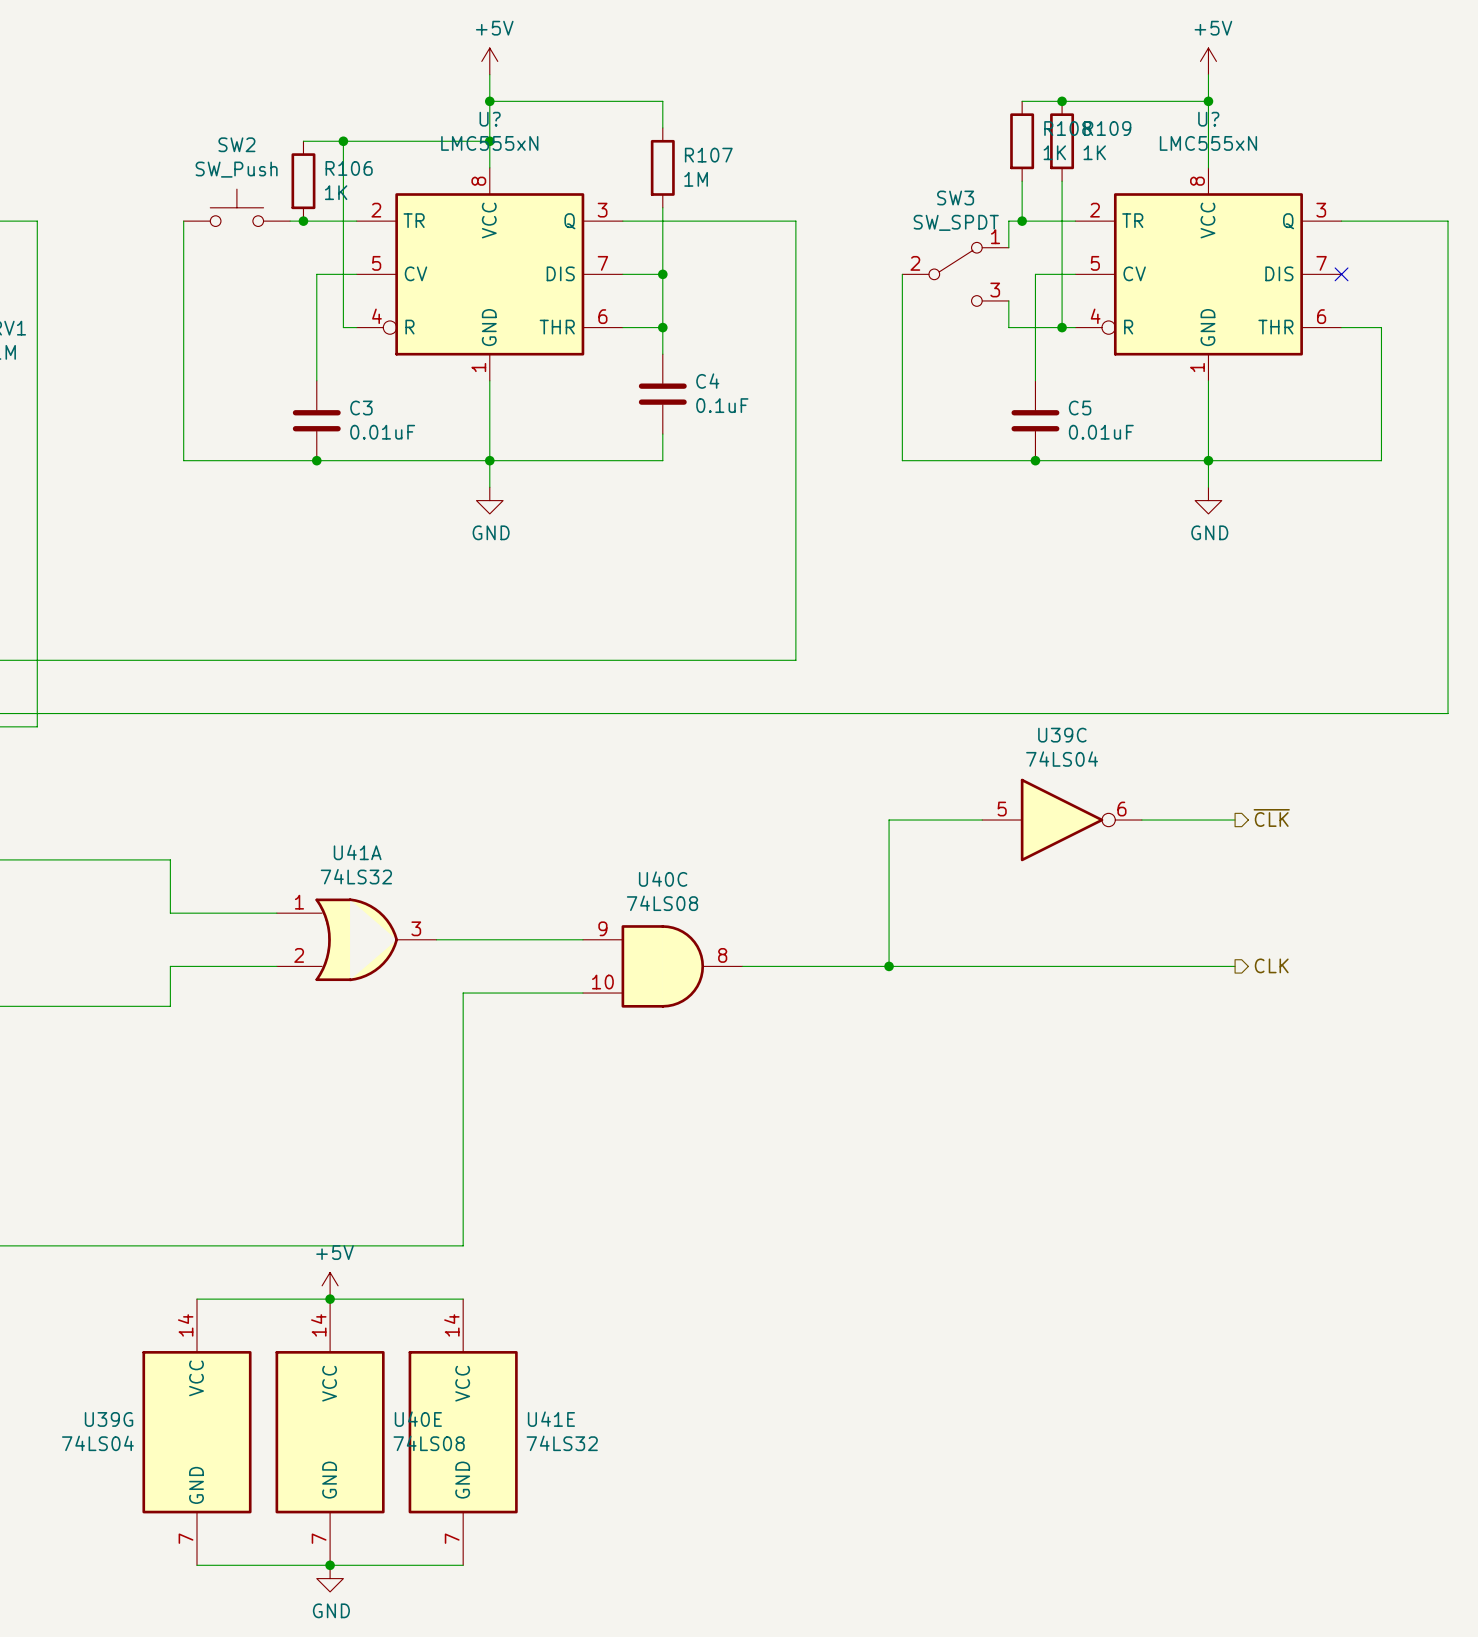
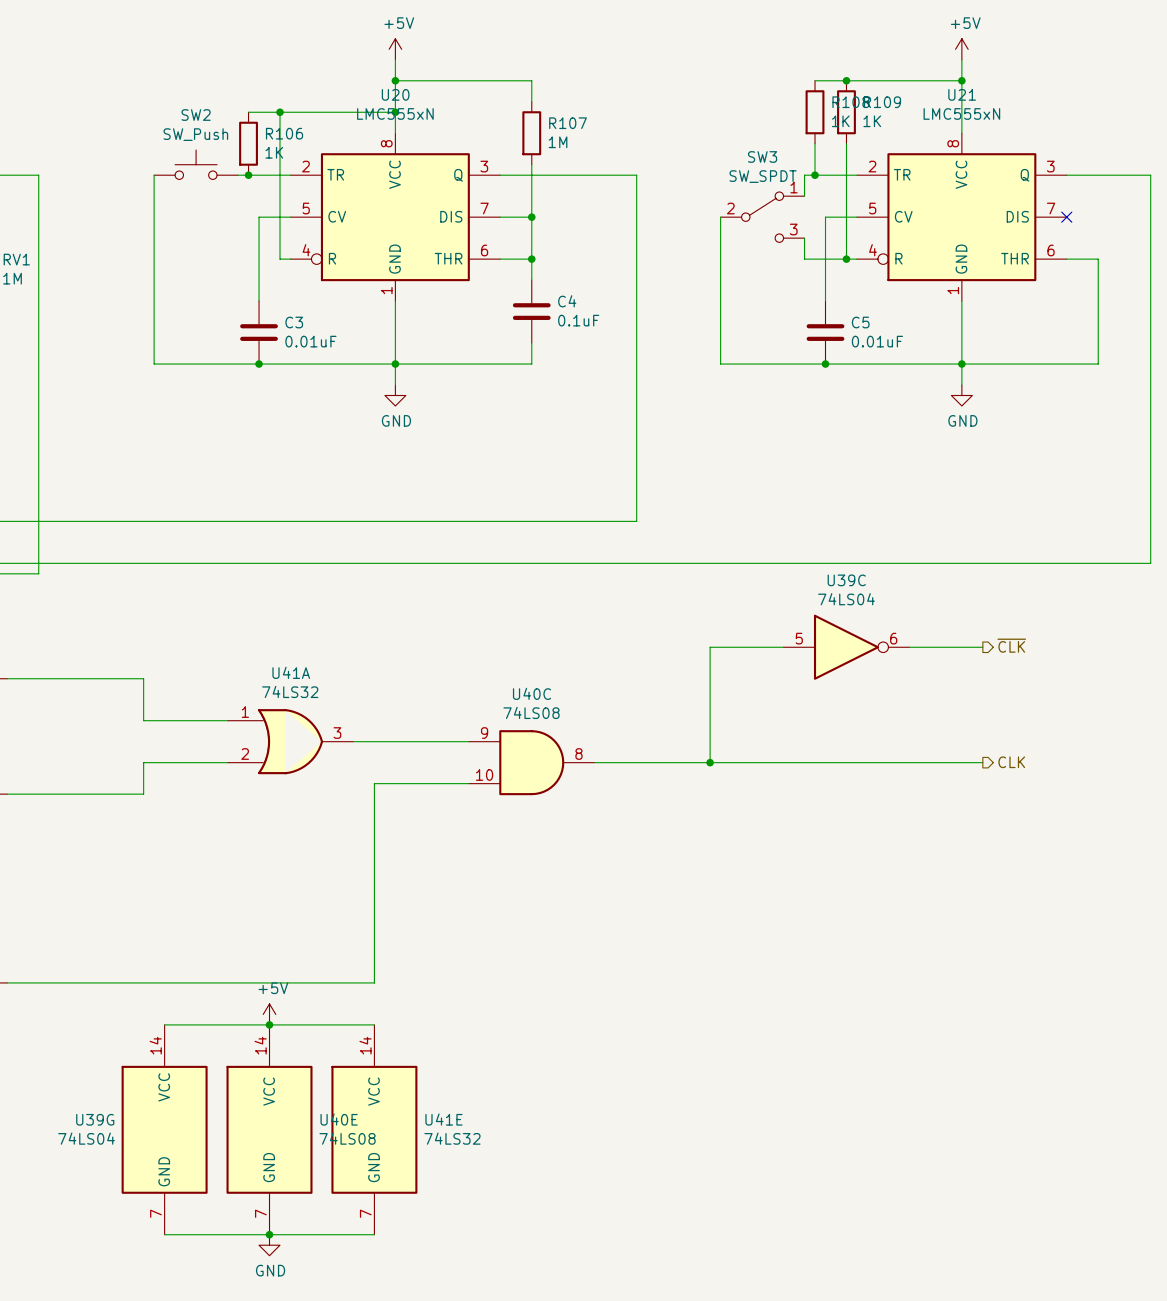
U? name: U? (490, 119) -> U20 (395, 94)
U? name: U? (1208, 119) -> U21 (962, 94)

